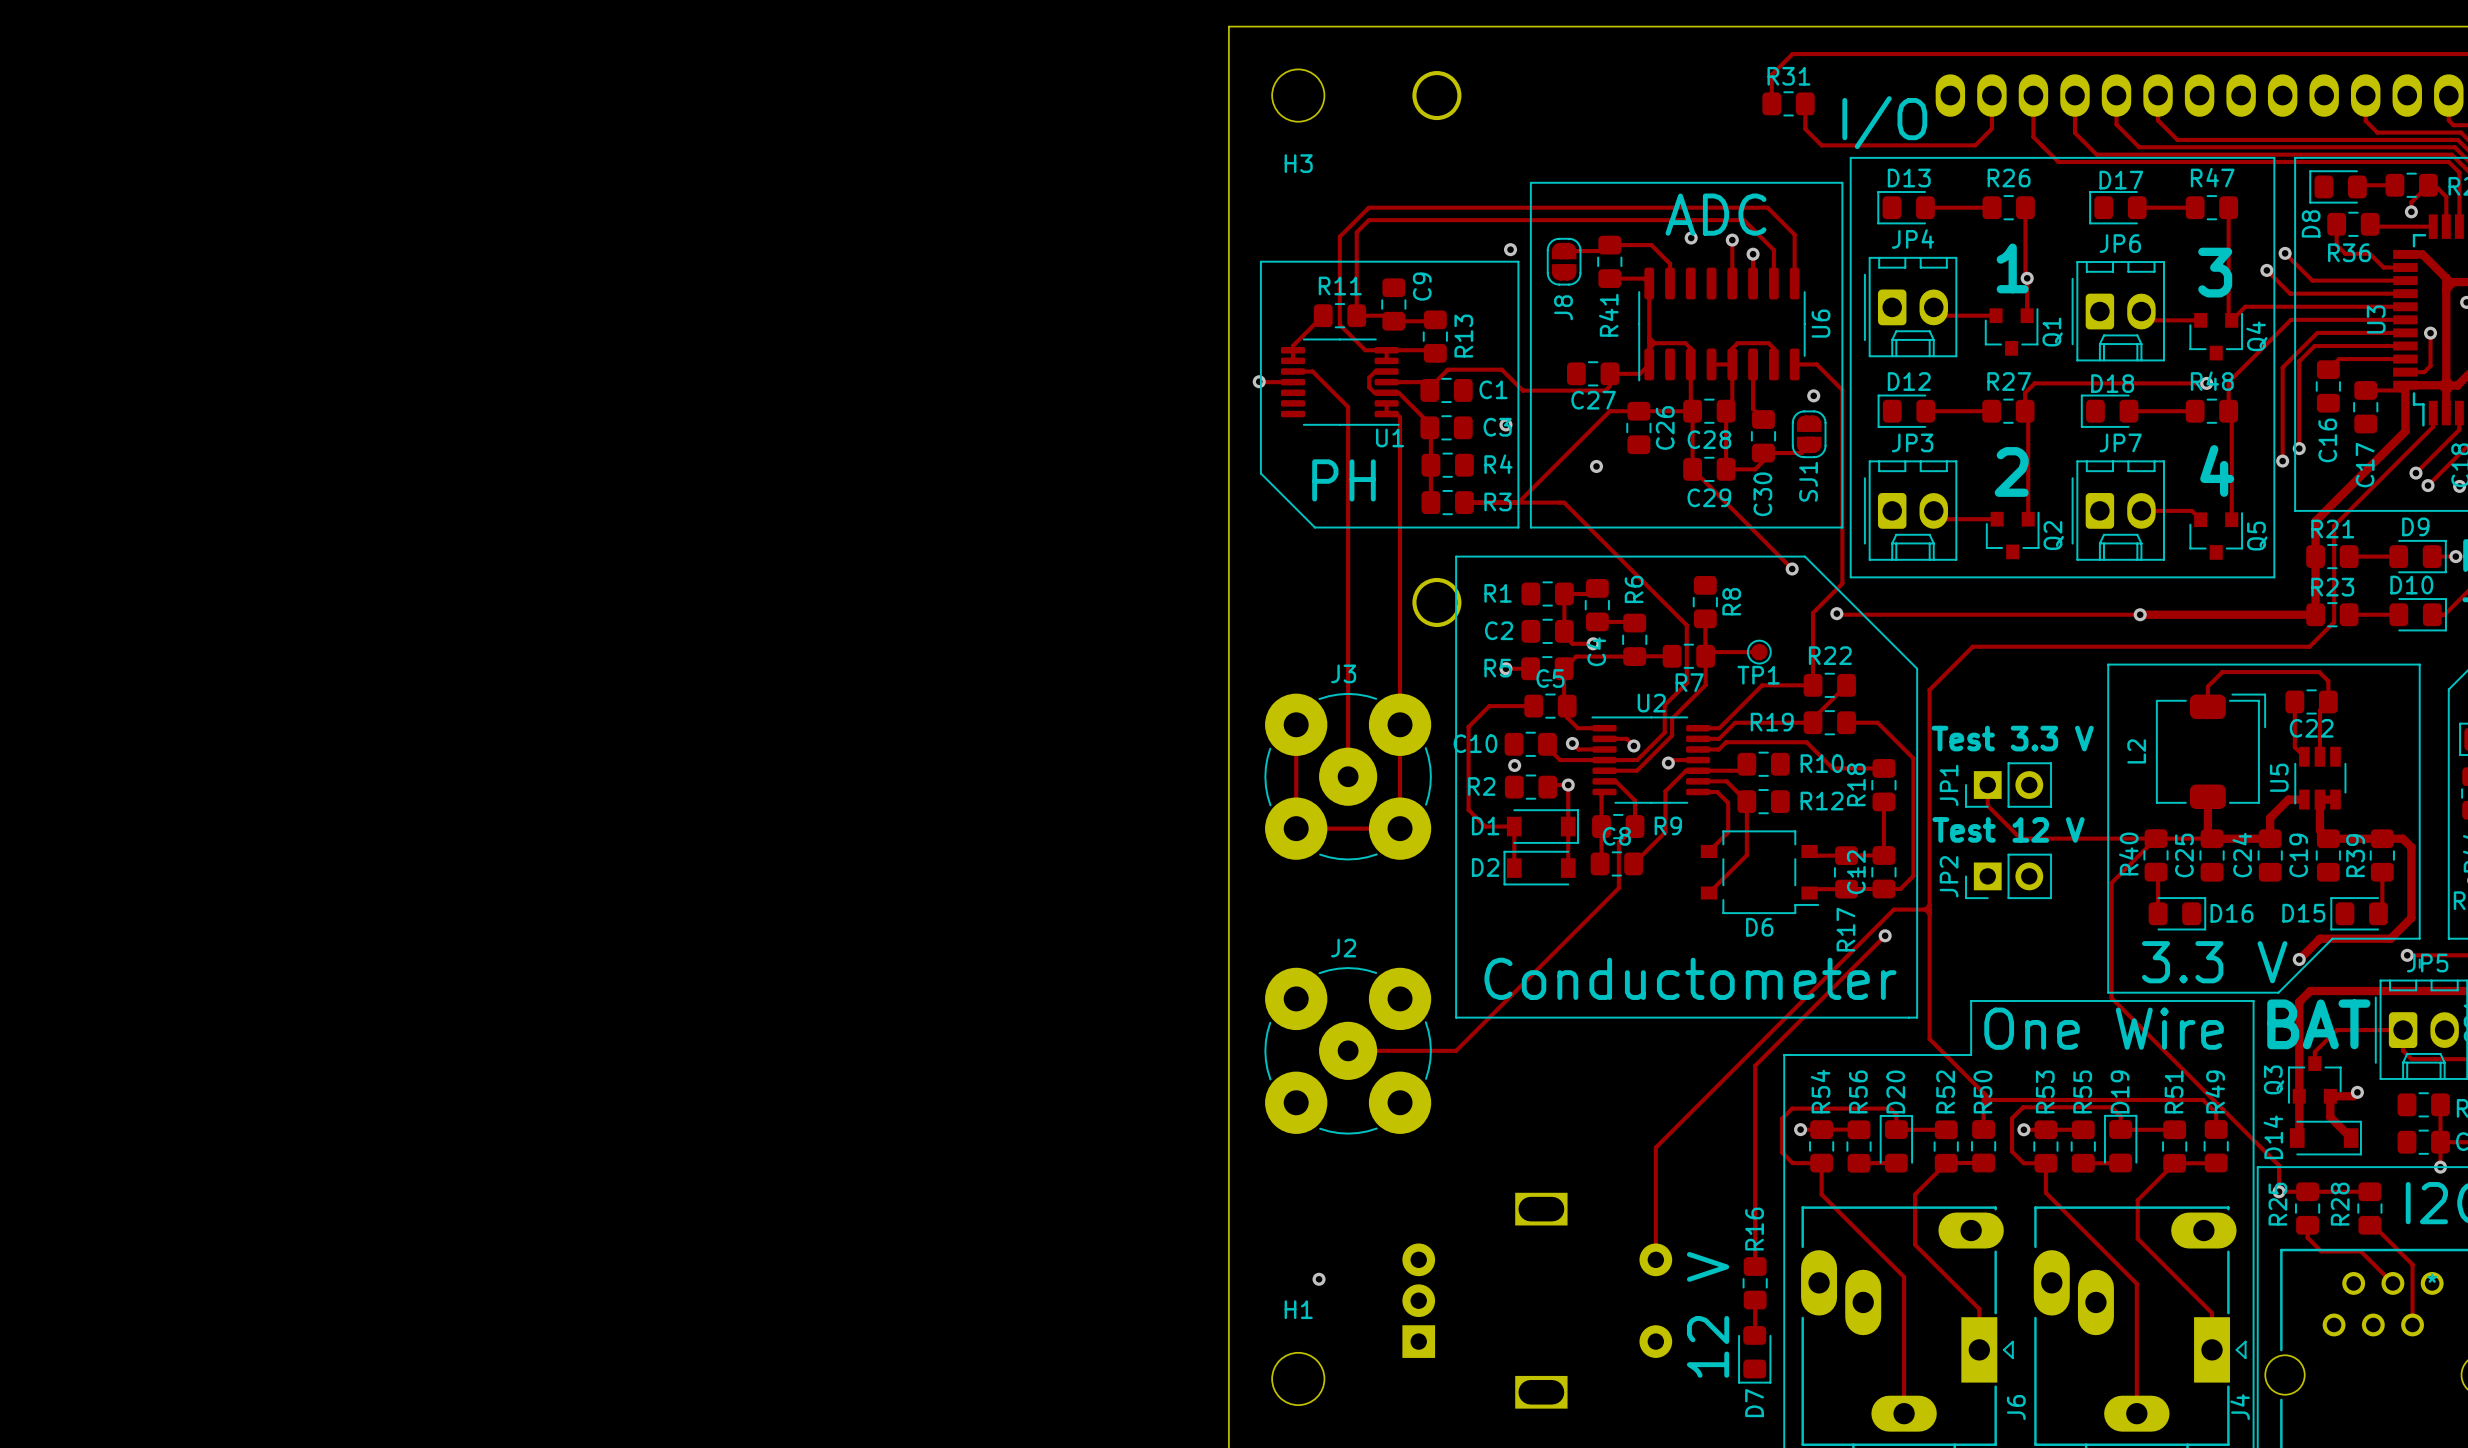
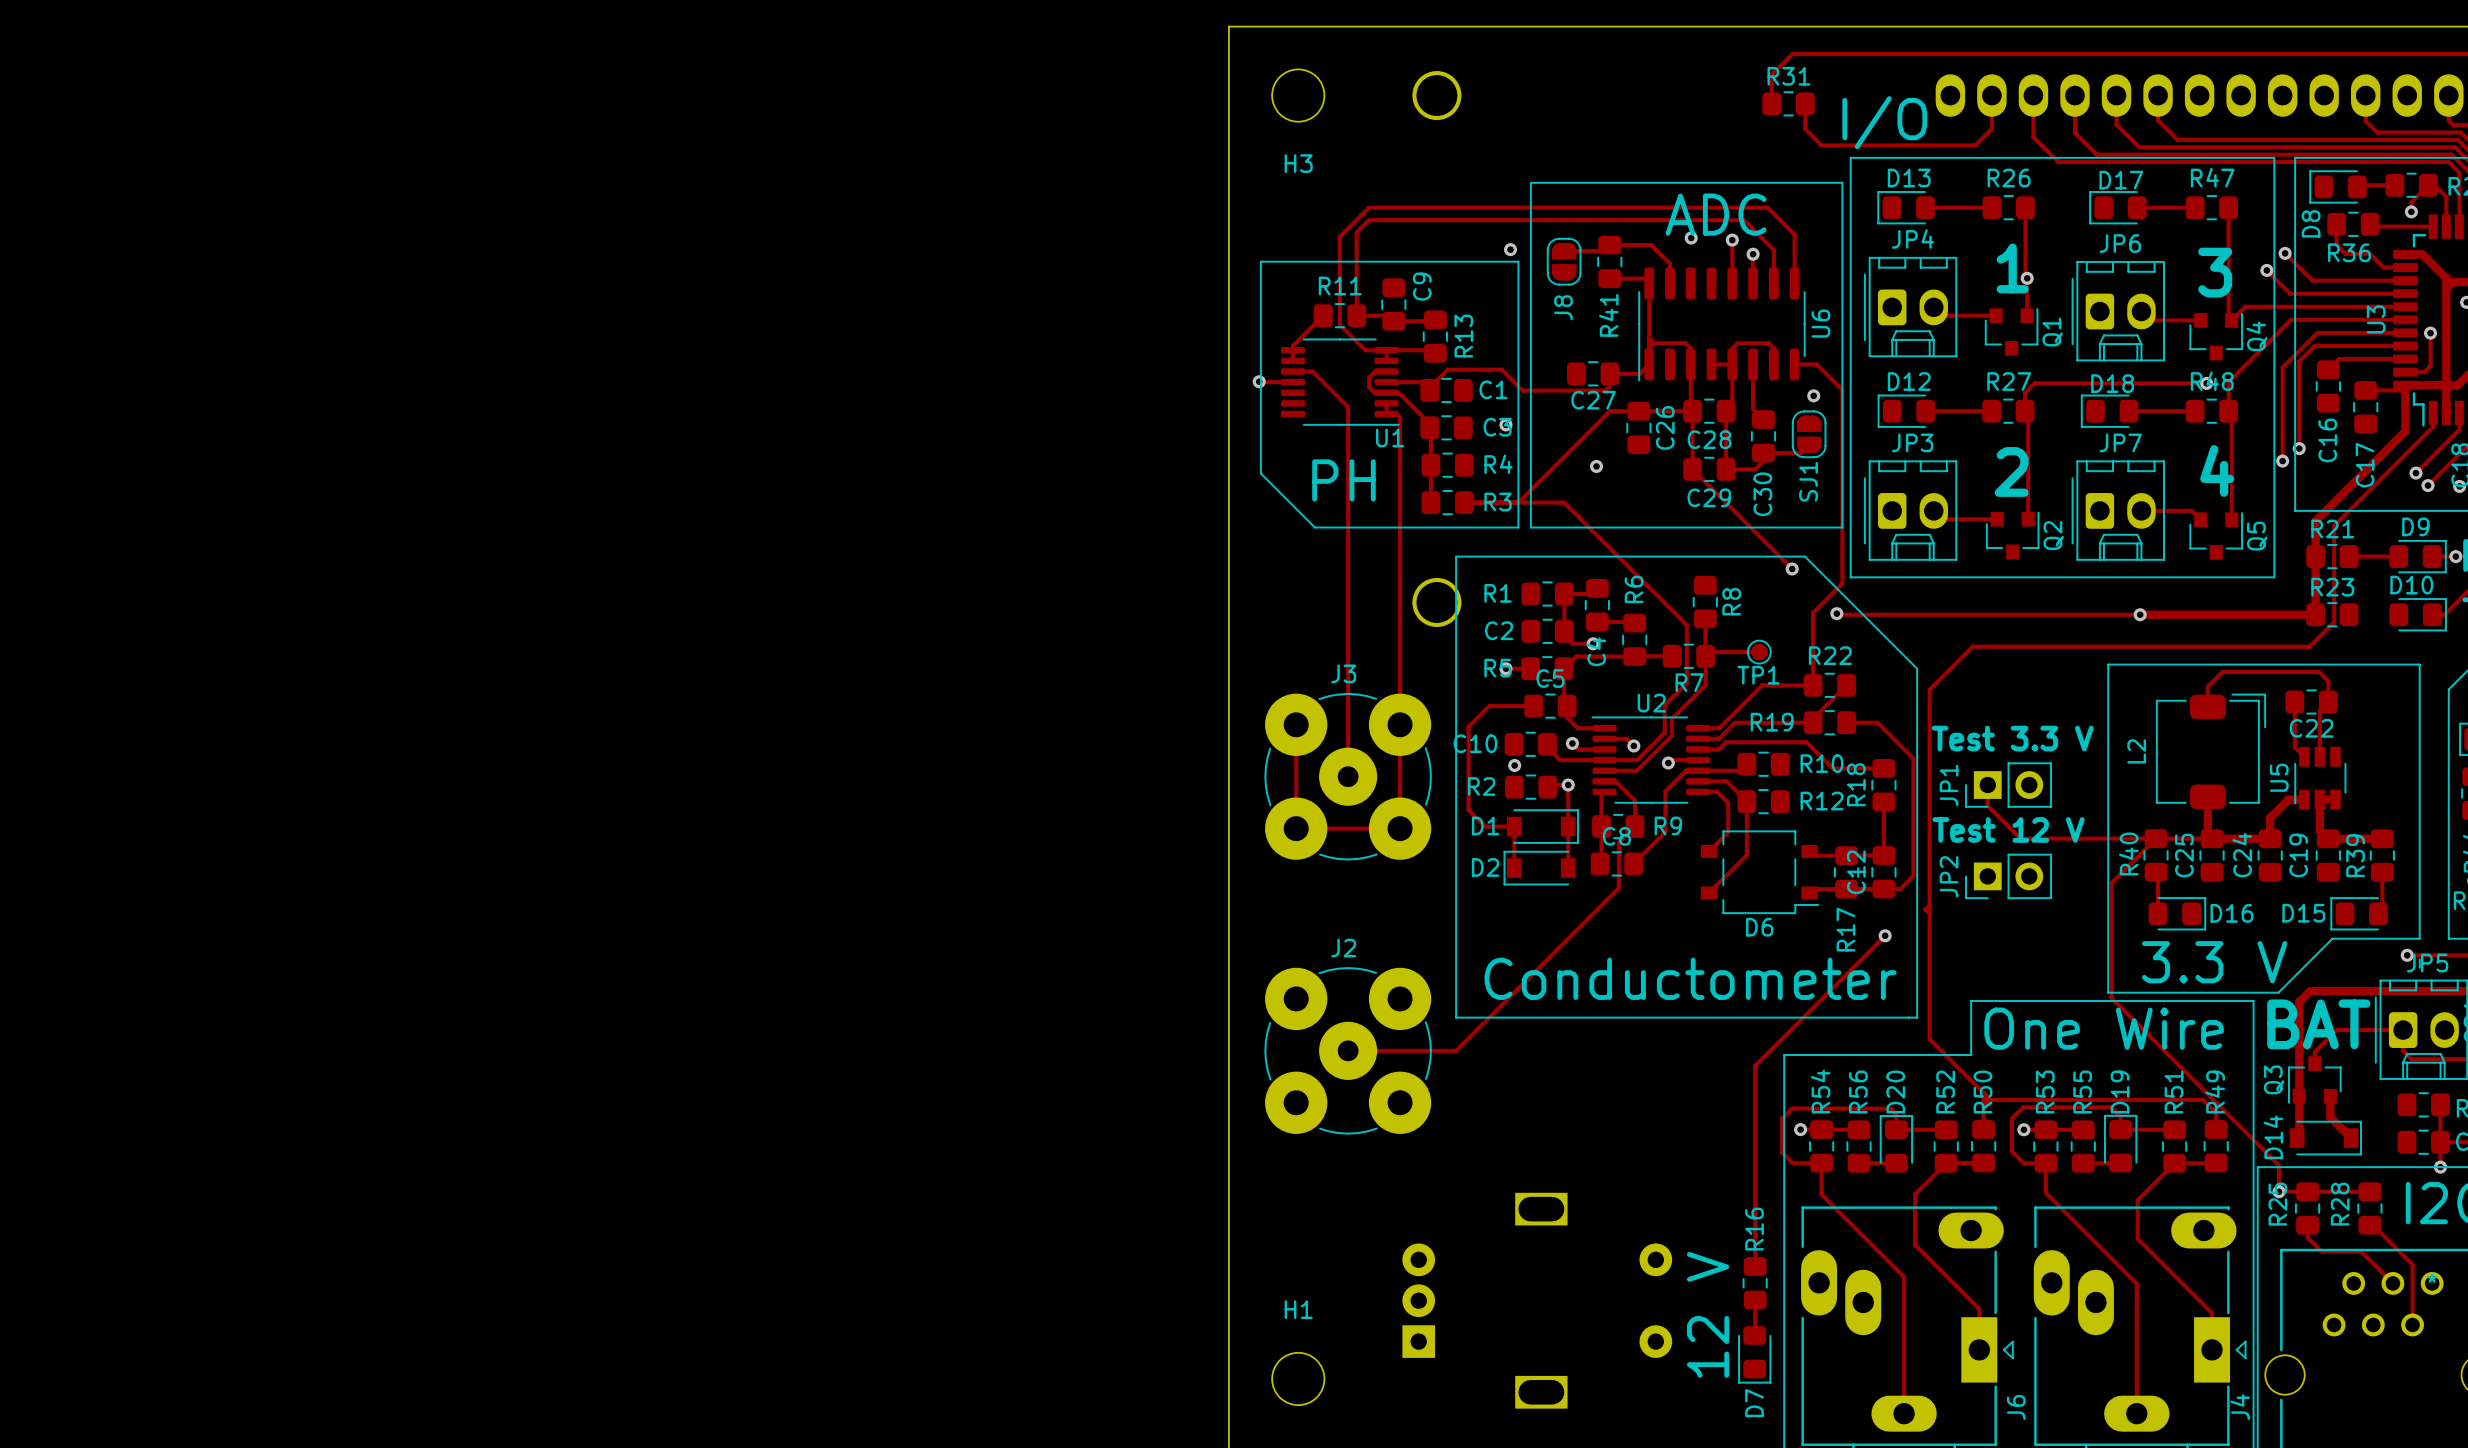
track: (2349, 614) (2398, 614) -> none
track: (2382, 838) (2402, 838) (2411, 847) (2411, 917) (2390, 938) (2320, 938) (2299, 959) -> none
track: (1929, 909) (1893, 909) (1655, 1147) (1655, 1259) -> none
via: (2299, 959) -> none
track: (2357, 1092) (2353, 1096) (2330, 1096) -> none
via: (2357, 1092) -> none
via: (1319, 1279) -> none

